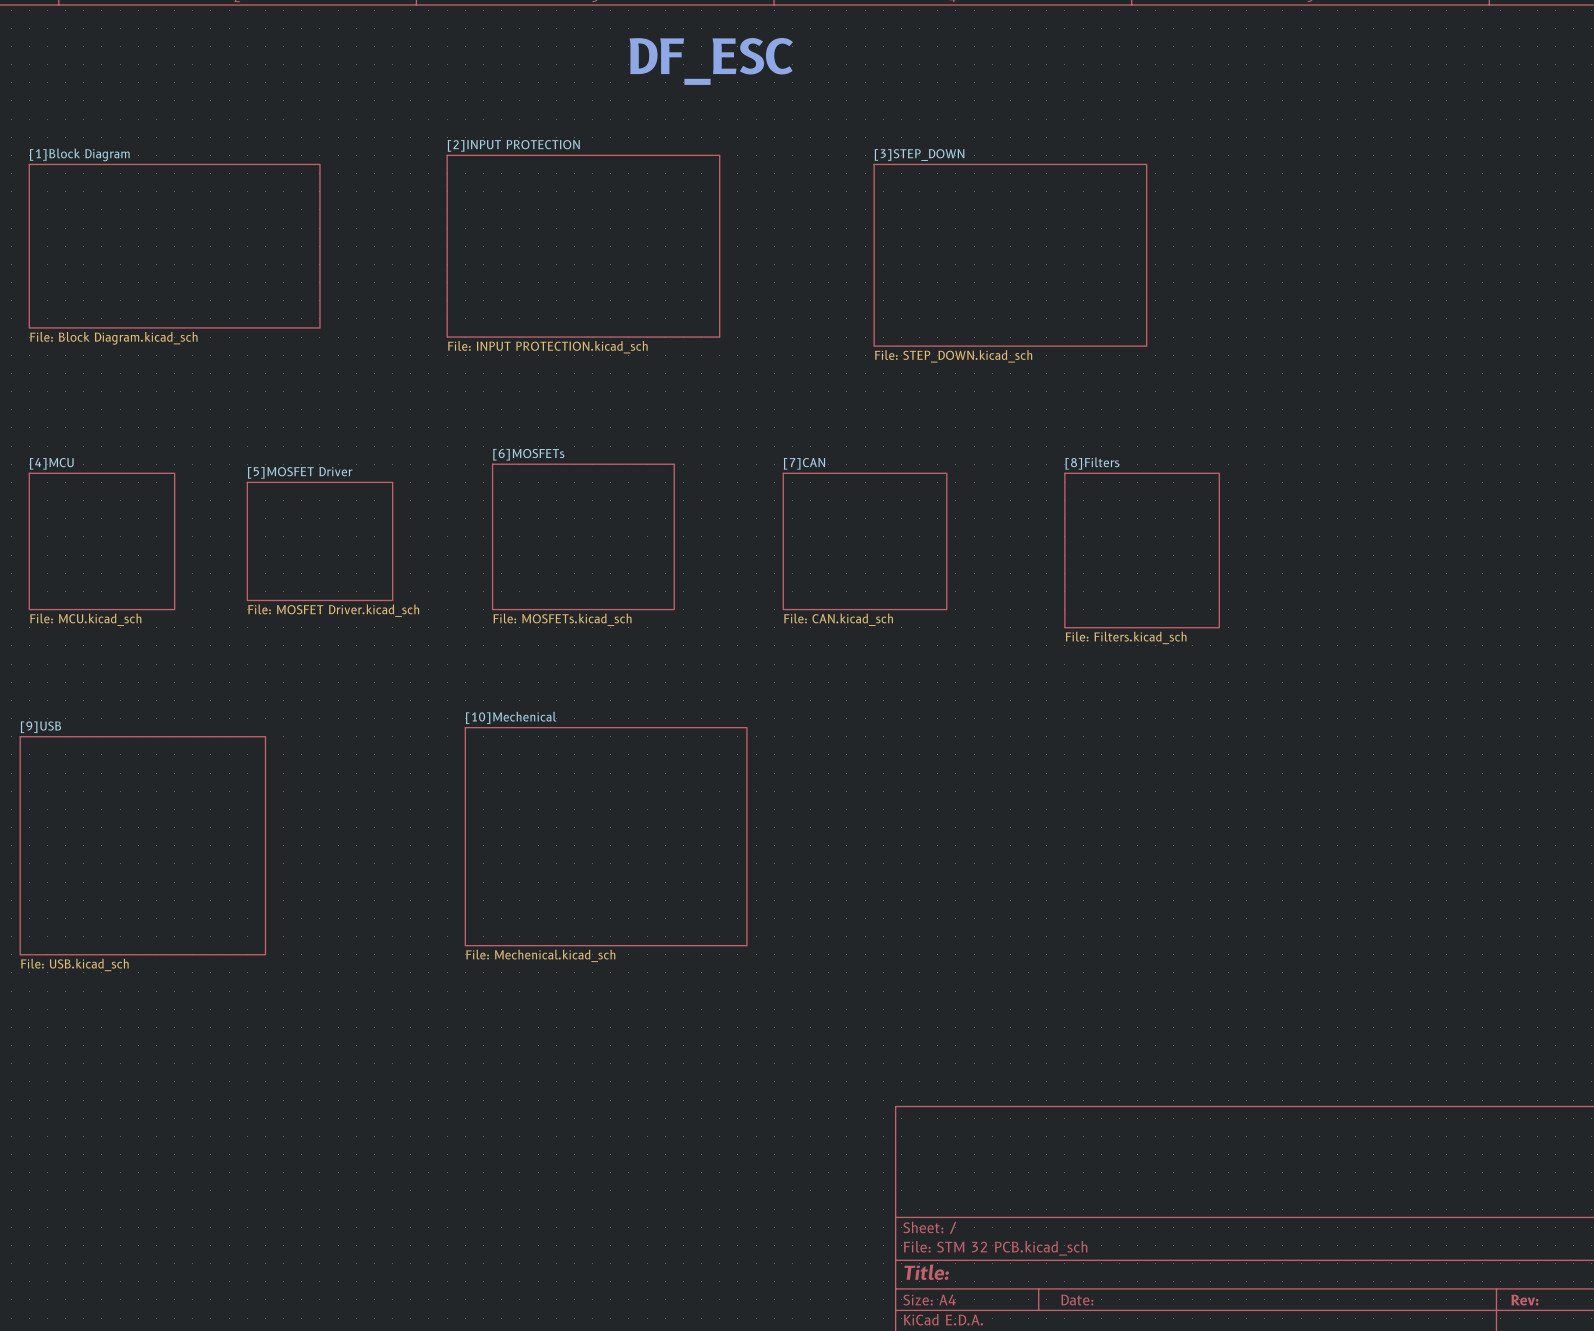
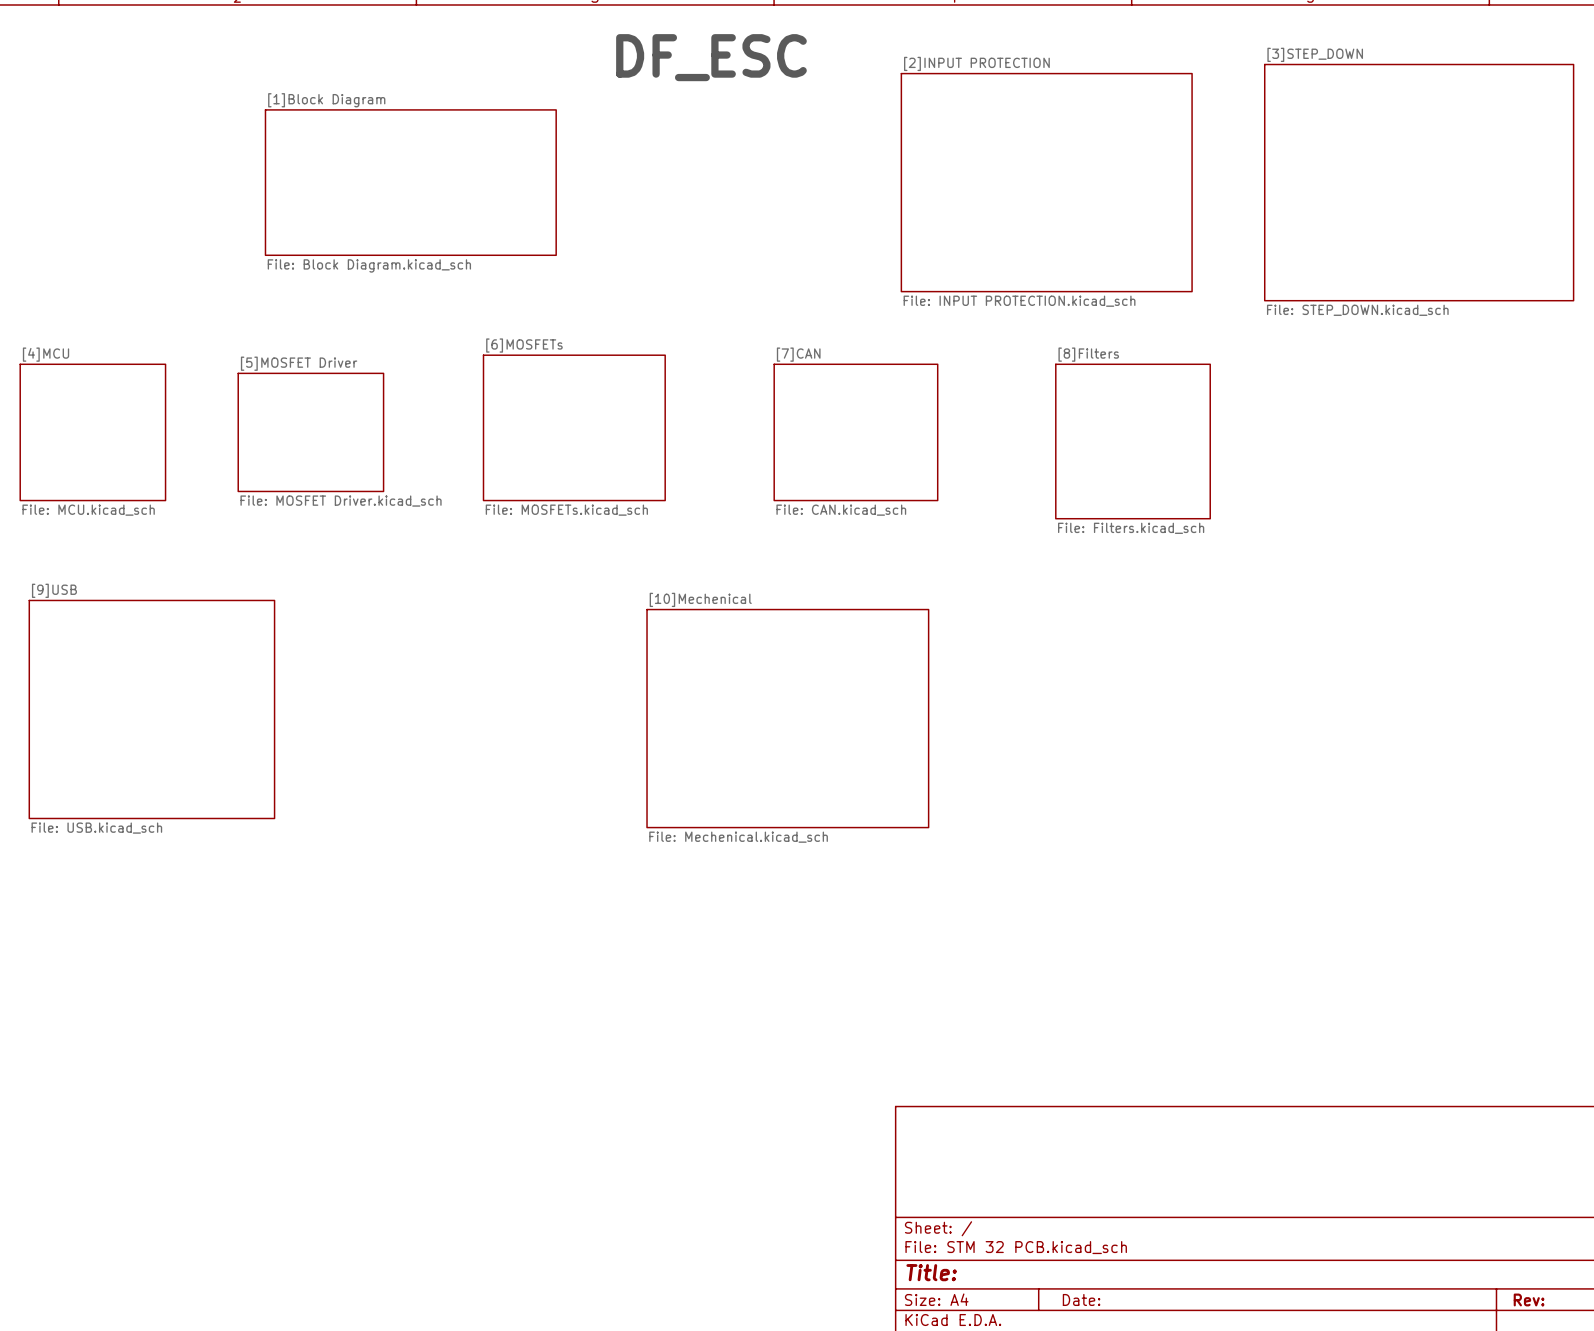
sheet [2]INPUT PROTECTION name position: [2]INPUT PROTECTION (513, 145) -> [2]INPUT PROTECTION (976, 63)
sheet [2]INPUT PROTECTION shape: [446, 154, 721, 338] -> [900, 73, 1193, 293]
sheet [3]STEP_DOWN name position: [3]STEP_DOWN (919, 155) -> [3]STEP_DOWN (1315, 54)
sheet [1]Block Diagram shape: [28, 163, 321, 329] -> [264, 109, 557, 256]
sheet [3]STEP_DOWN shape: [873, 163, 1148, 347] -> [1264, 63, 1575, 302]
sheet [2]INPUT PROTECTION value position: File: INPUT PROTECTION.kicad_sch (547, 347) -> File: INPUT PROTECTION.kicad_sch (1019, 301)
sheet [3]STEP_DOWN value position: File: STEP_DOWN.kicad_sch (953, 356) -> File: STEP_DOWN.kicad_sch (1357, 310)
sheet [6]MOSFETs position: (583, 536) -> (574, 427)
sheet [4]MCU position: (101, 541) -> (92, 432)
sheet [5]MOSFET Driver position: (319, 541) -> (310, 432)
sheet [7]CAN position: (865, 541) -> (855, 432)
sheet [8]Filters position: (1142, 550) -> (1133, 441)
sheet [10]Mechenical position: (606, 836) -> (787, 718)
sheet [9]USB position: (142, 845) -> (151, 709)

